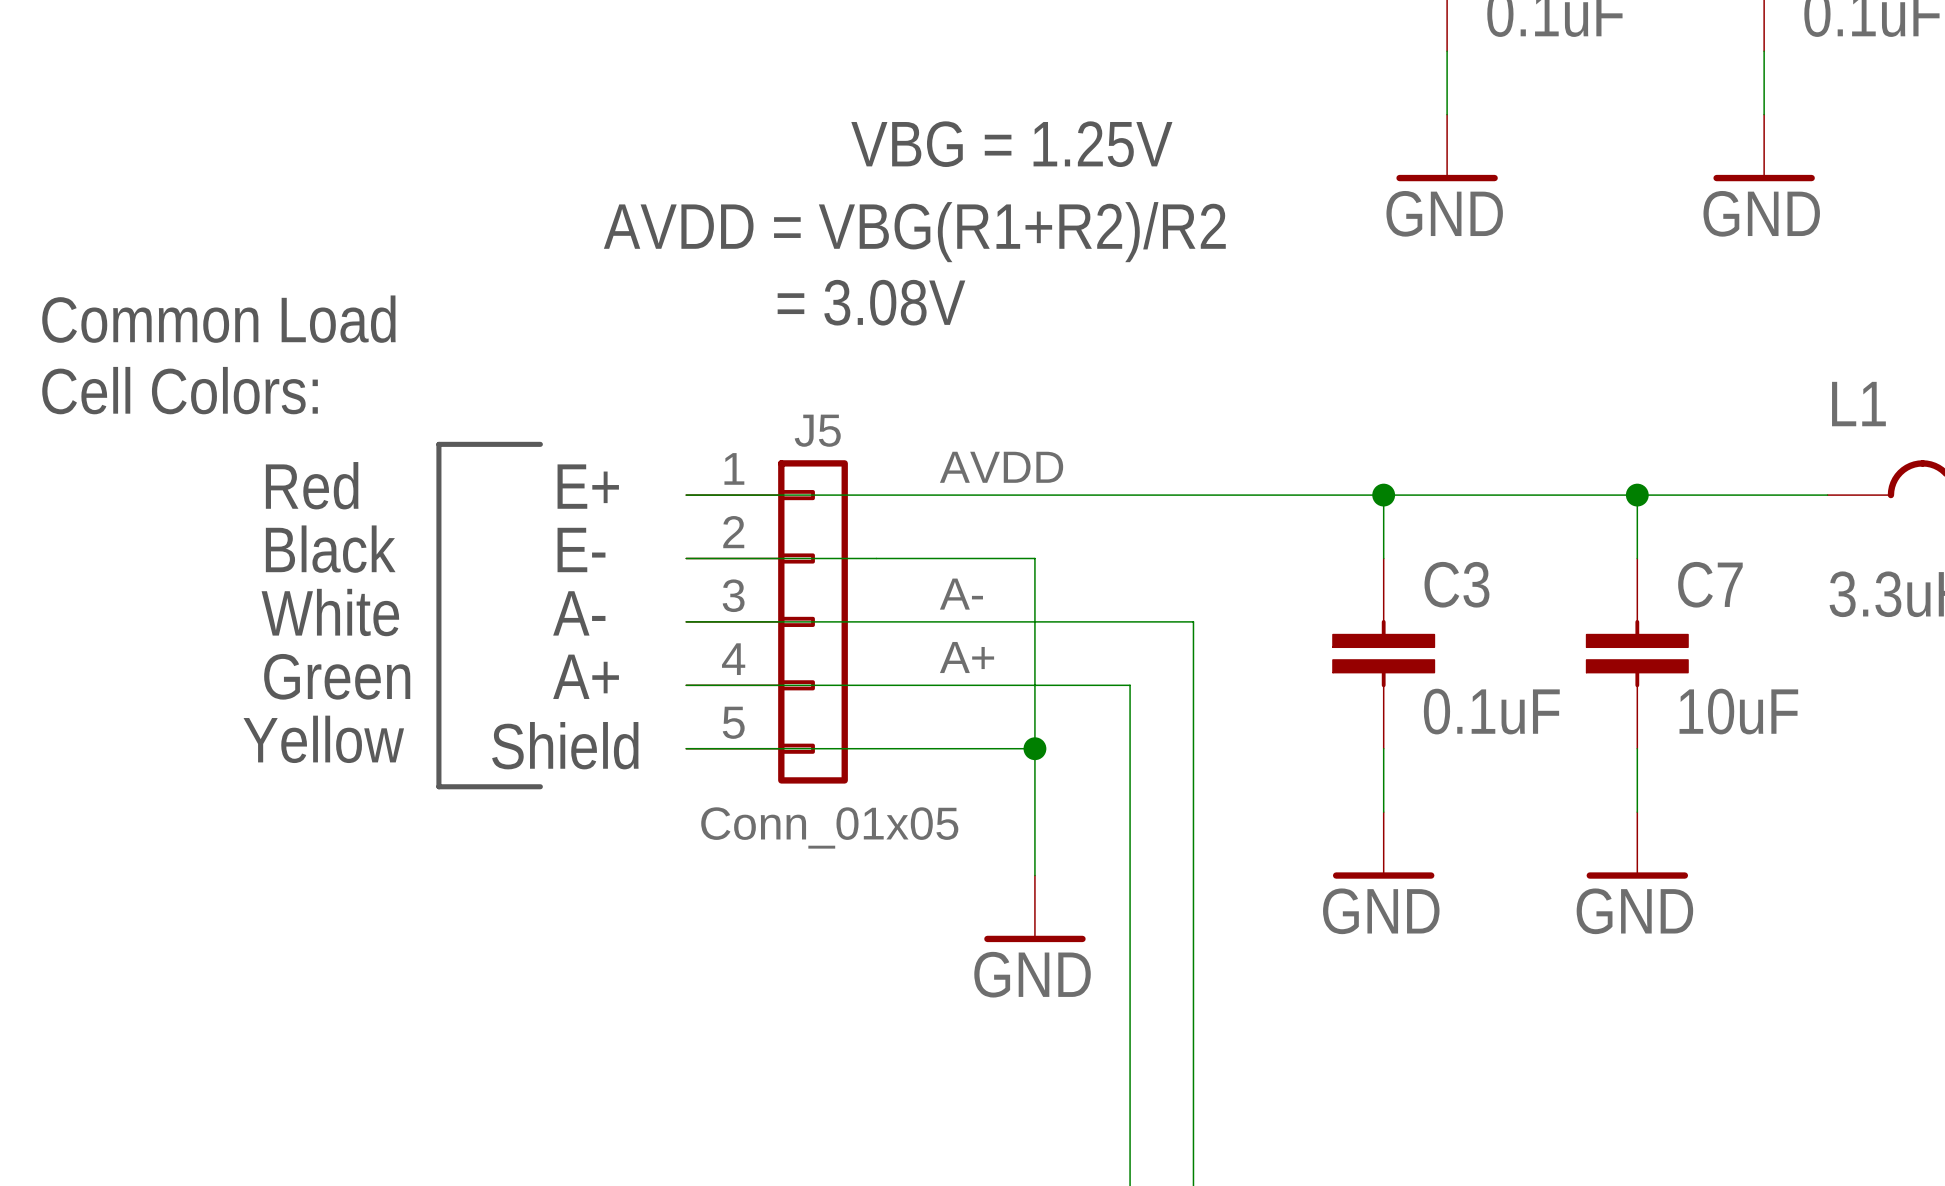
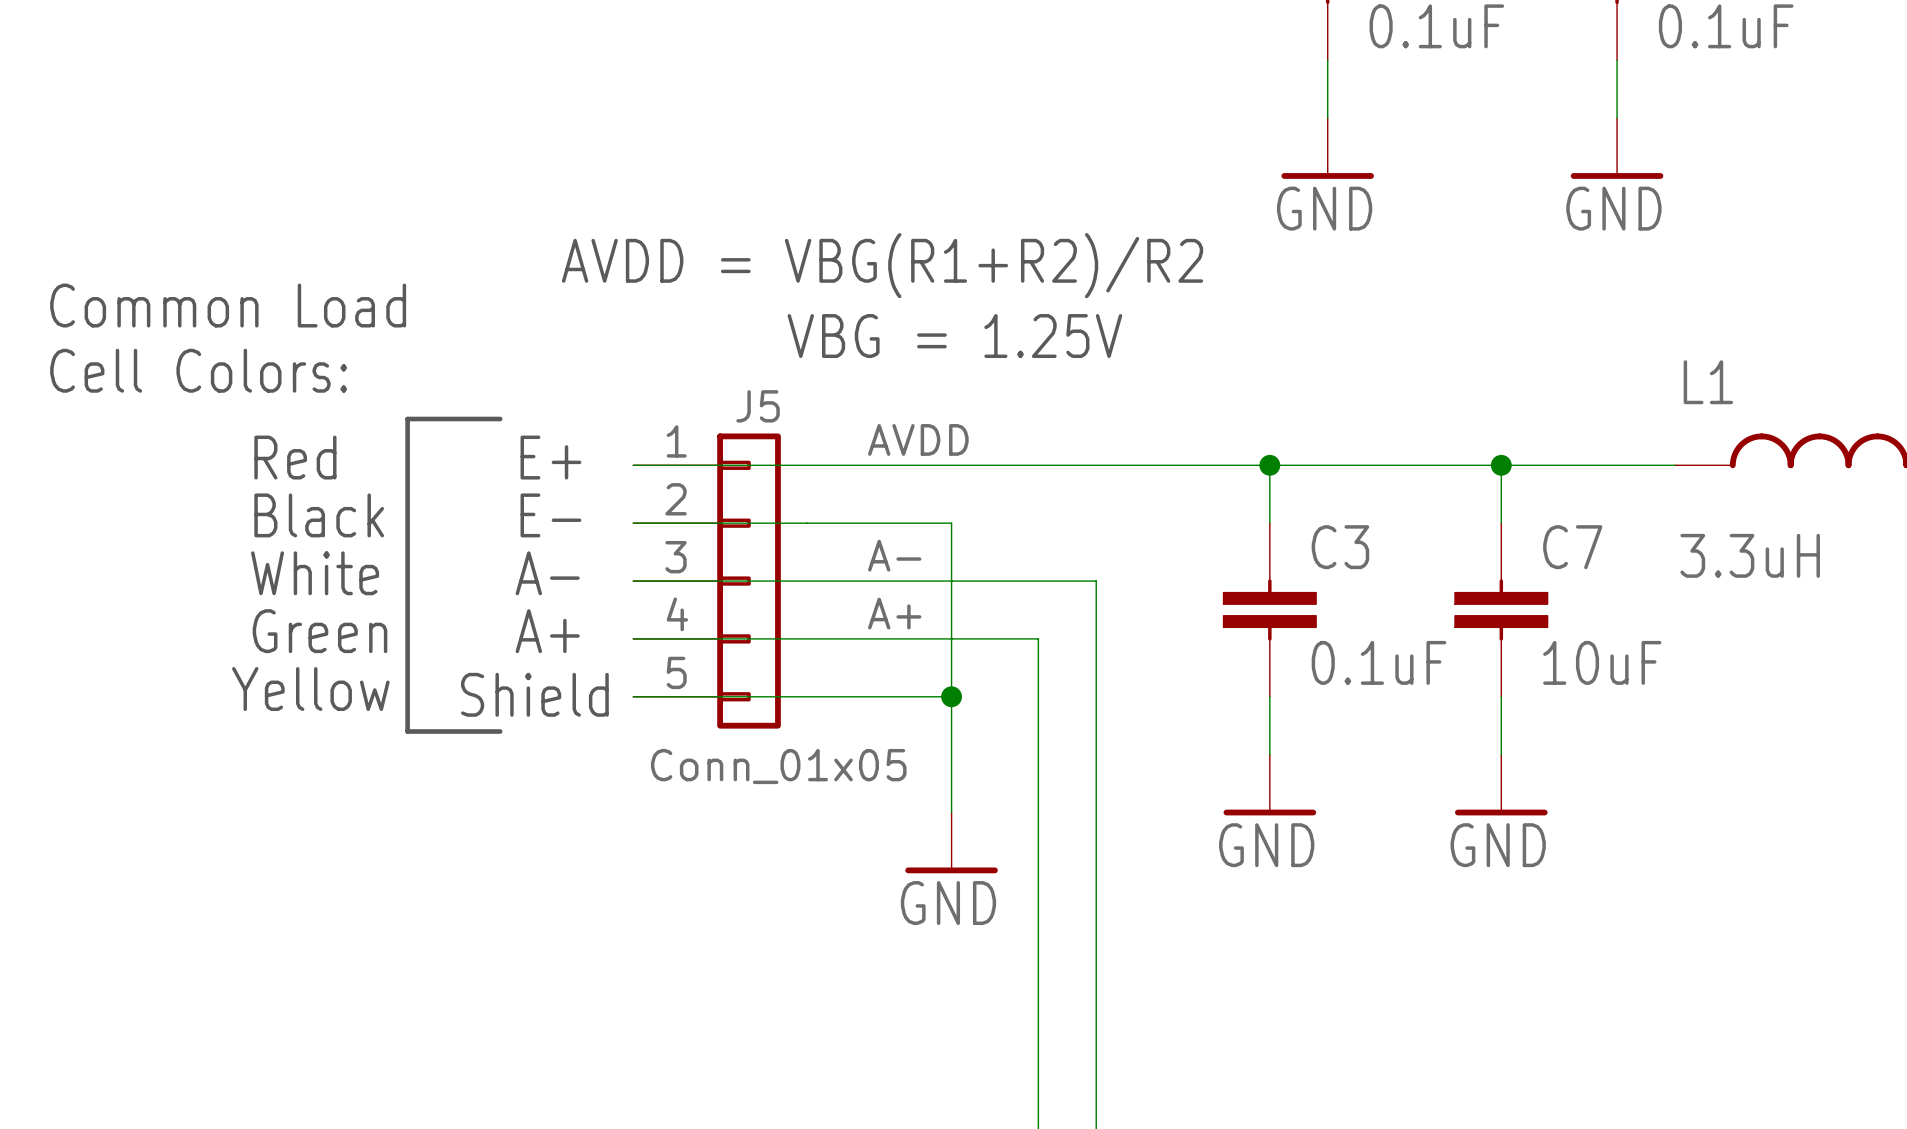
text position: VBG = 1.25V (1011, 144) -> VBG = 1.25V (954, 336)
text position: AVDD = VBG(R1+R2)/R2 (914, 232) -> AVDD = VBG(R1+R2)/R2 (882, 265)
text: = 3.08V (871, 302) -> none

